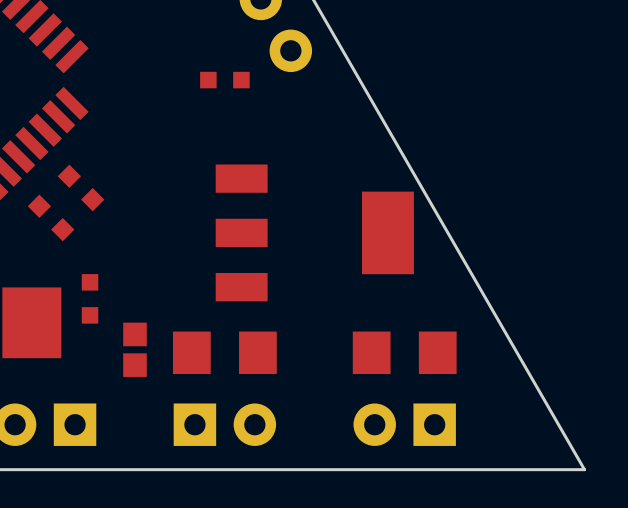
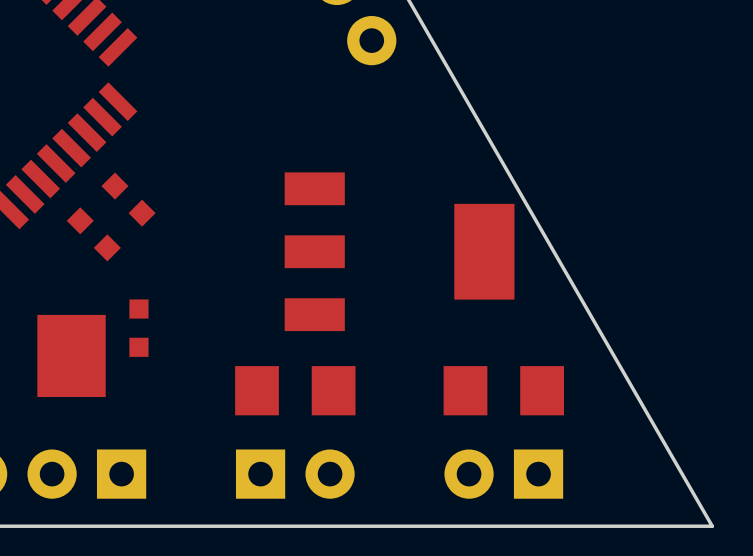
part: (224, 80) -> none
part: (134, 349) -> none

